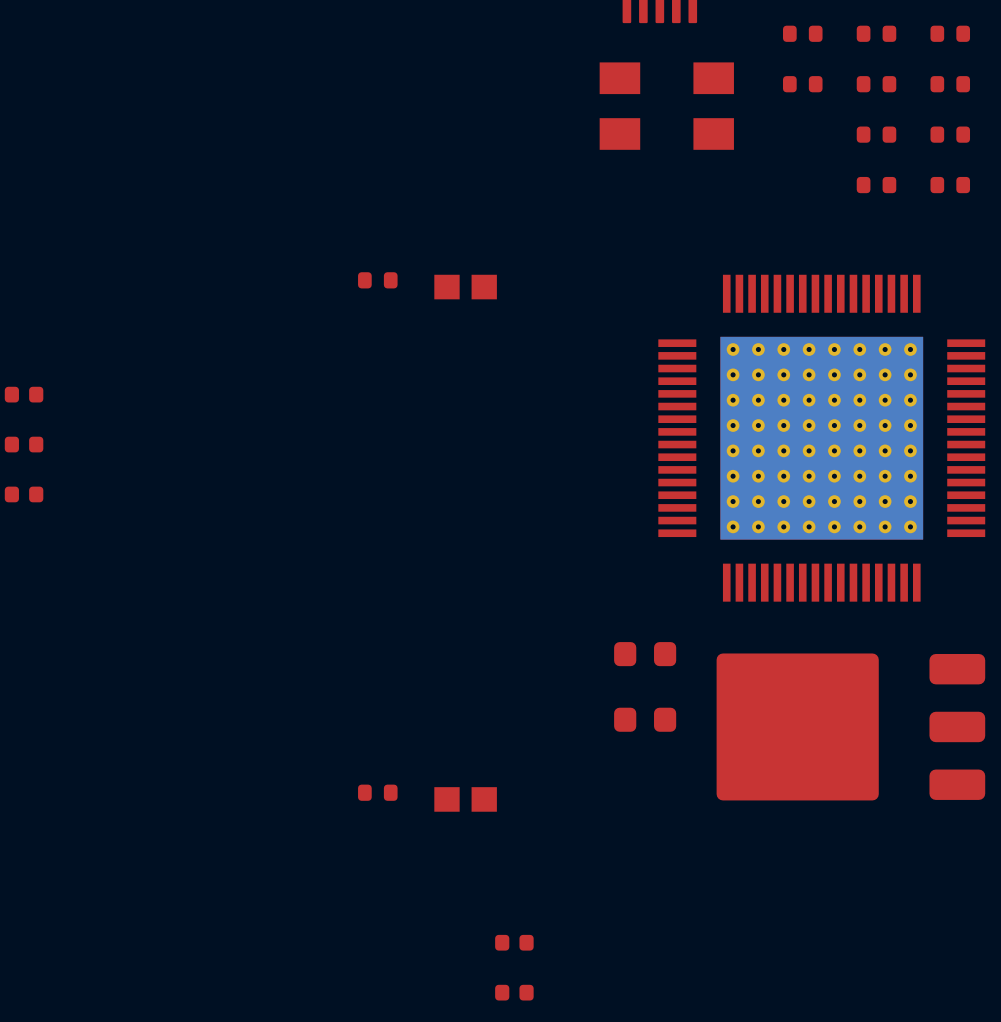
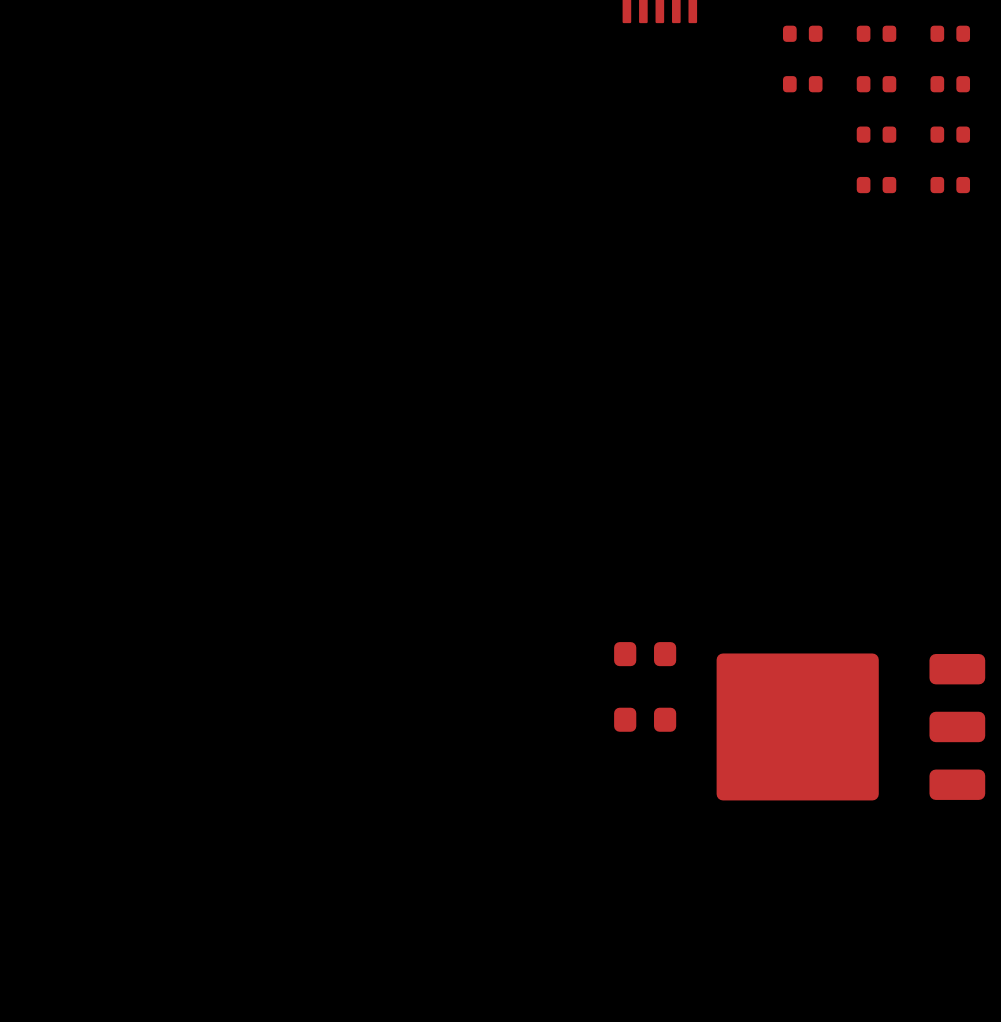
part: (666, 106) -> none
part: (377, 280) -> none
part: (465, 287) -> none
part: (24, 394) -> none
part: (821, 438) -> none
part: (24, 444) -> none
part: (24, 494) -> none
part: (377, 792) -> none
part: (465, 799) -> none
part: (514, 942) -> none
part: (514, 992) -> none

